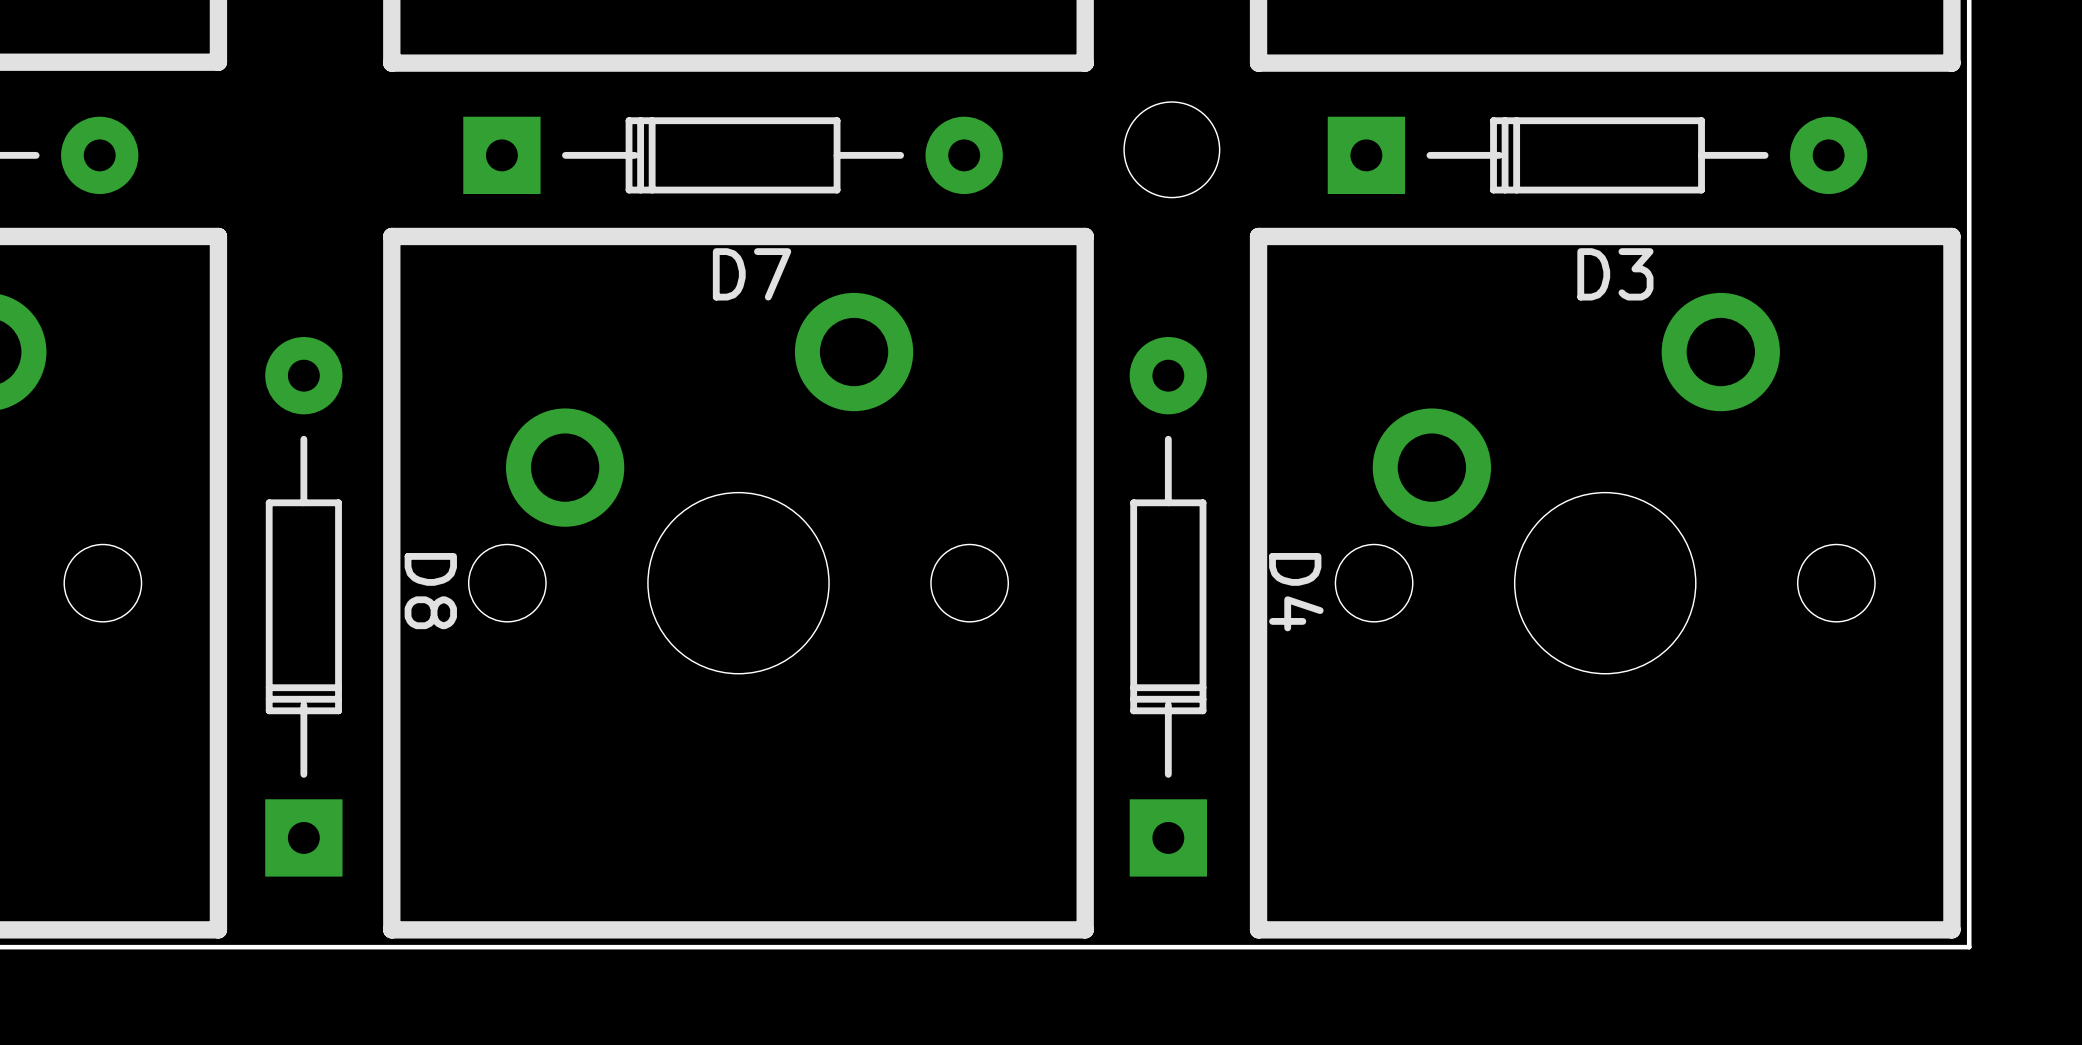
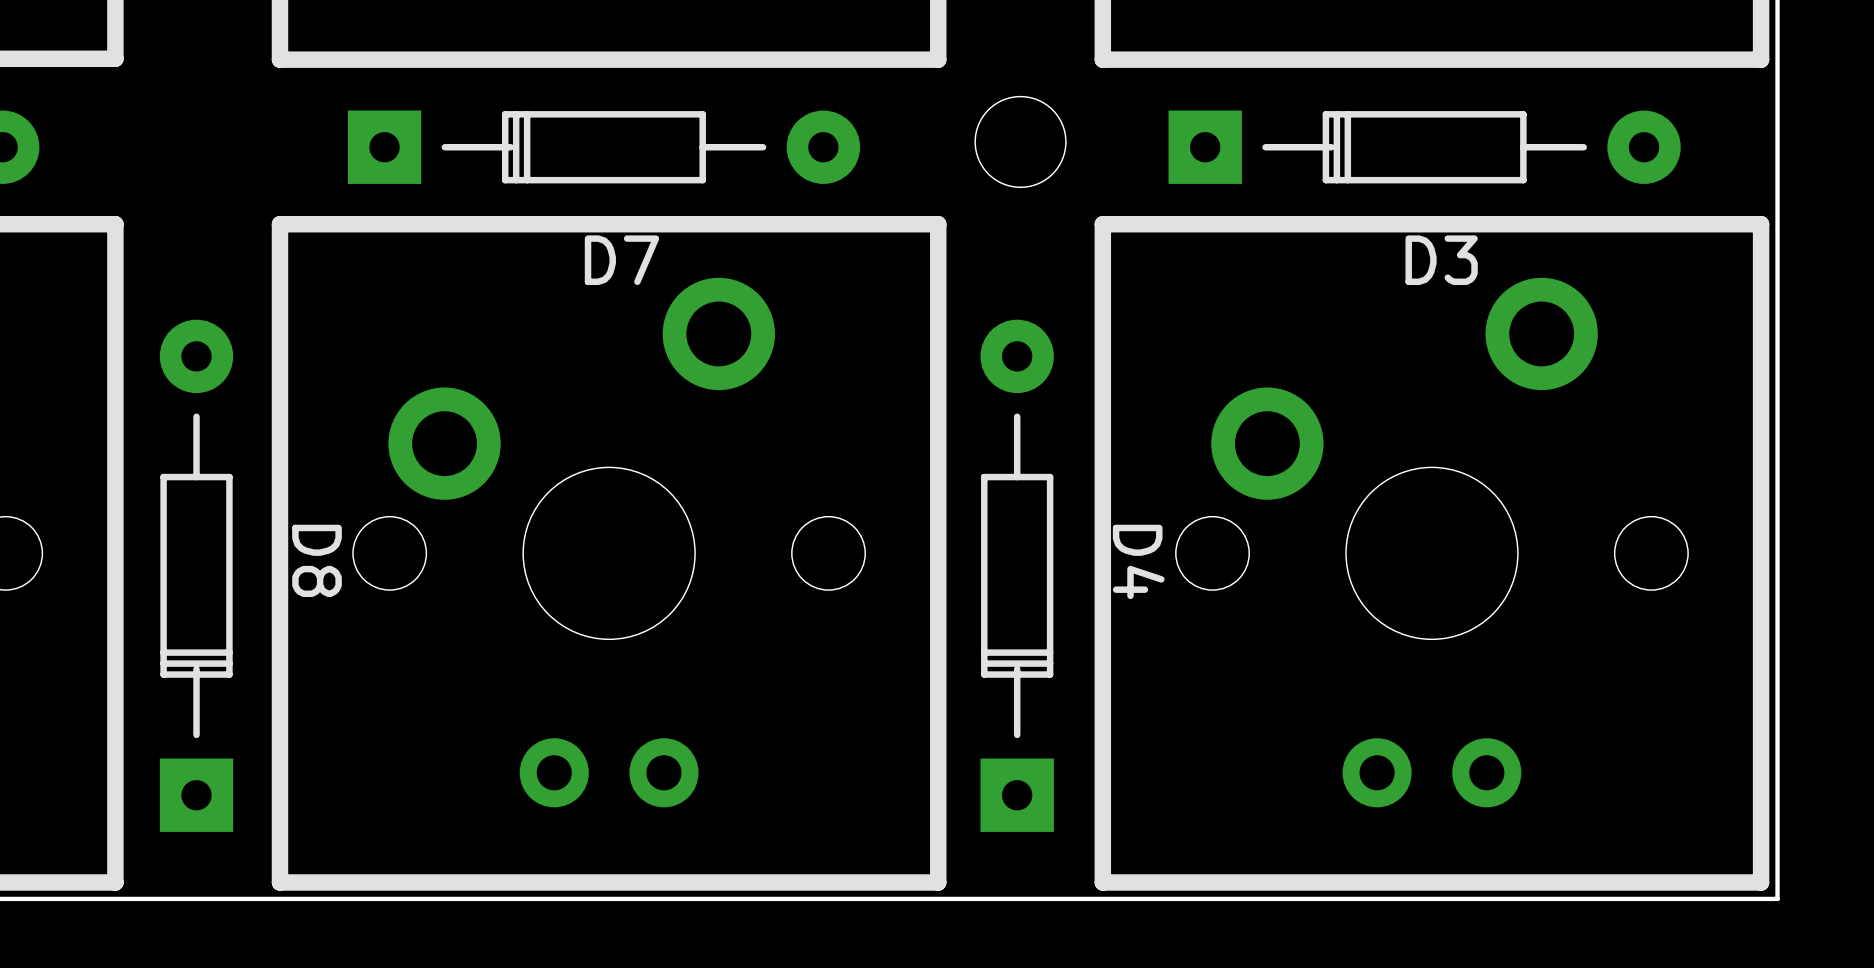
part: none -> (609, 772)
part: none -> (1431, 772)

